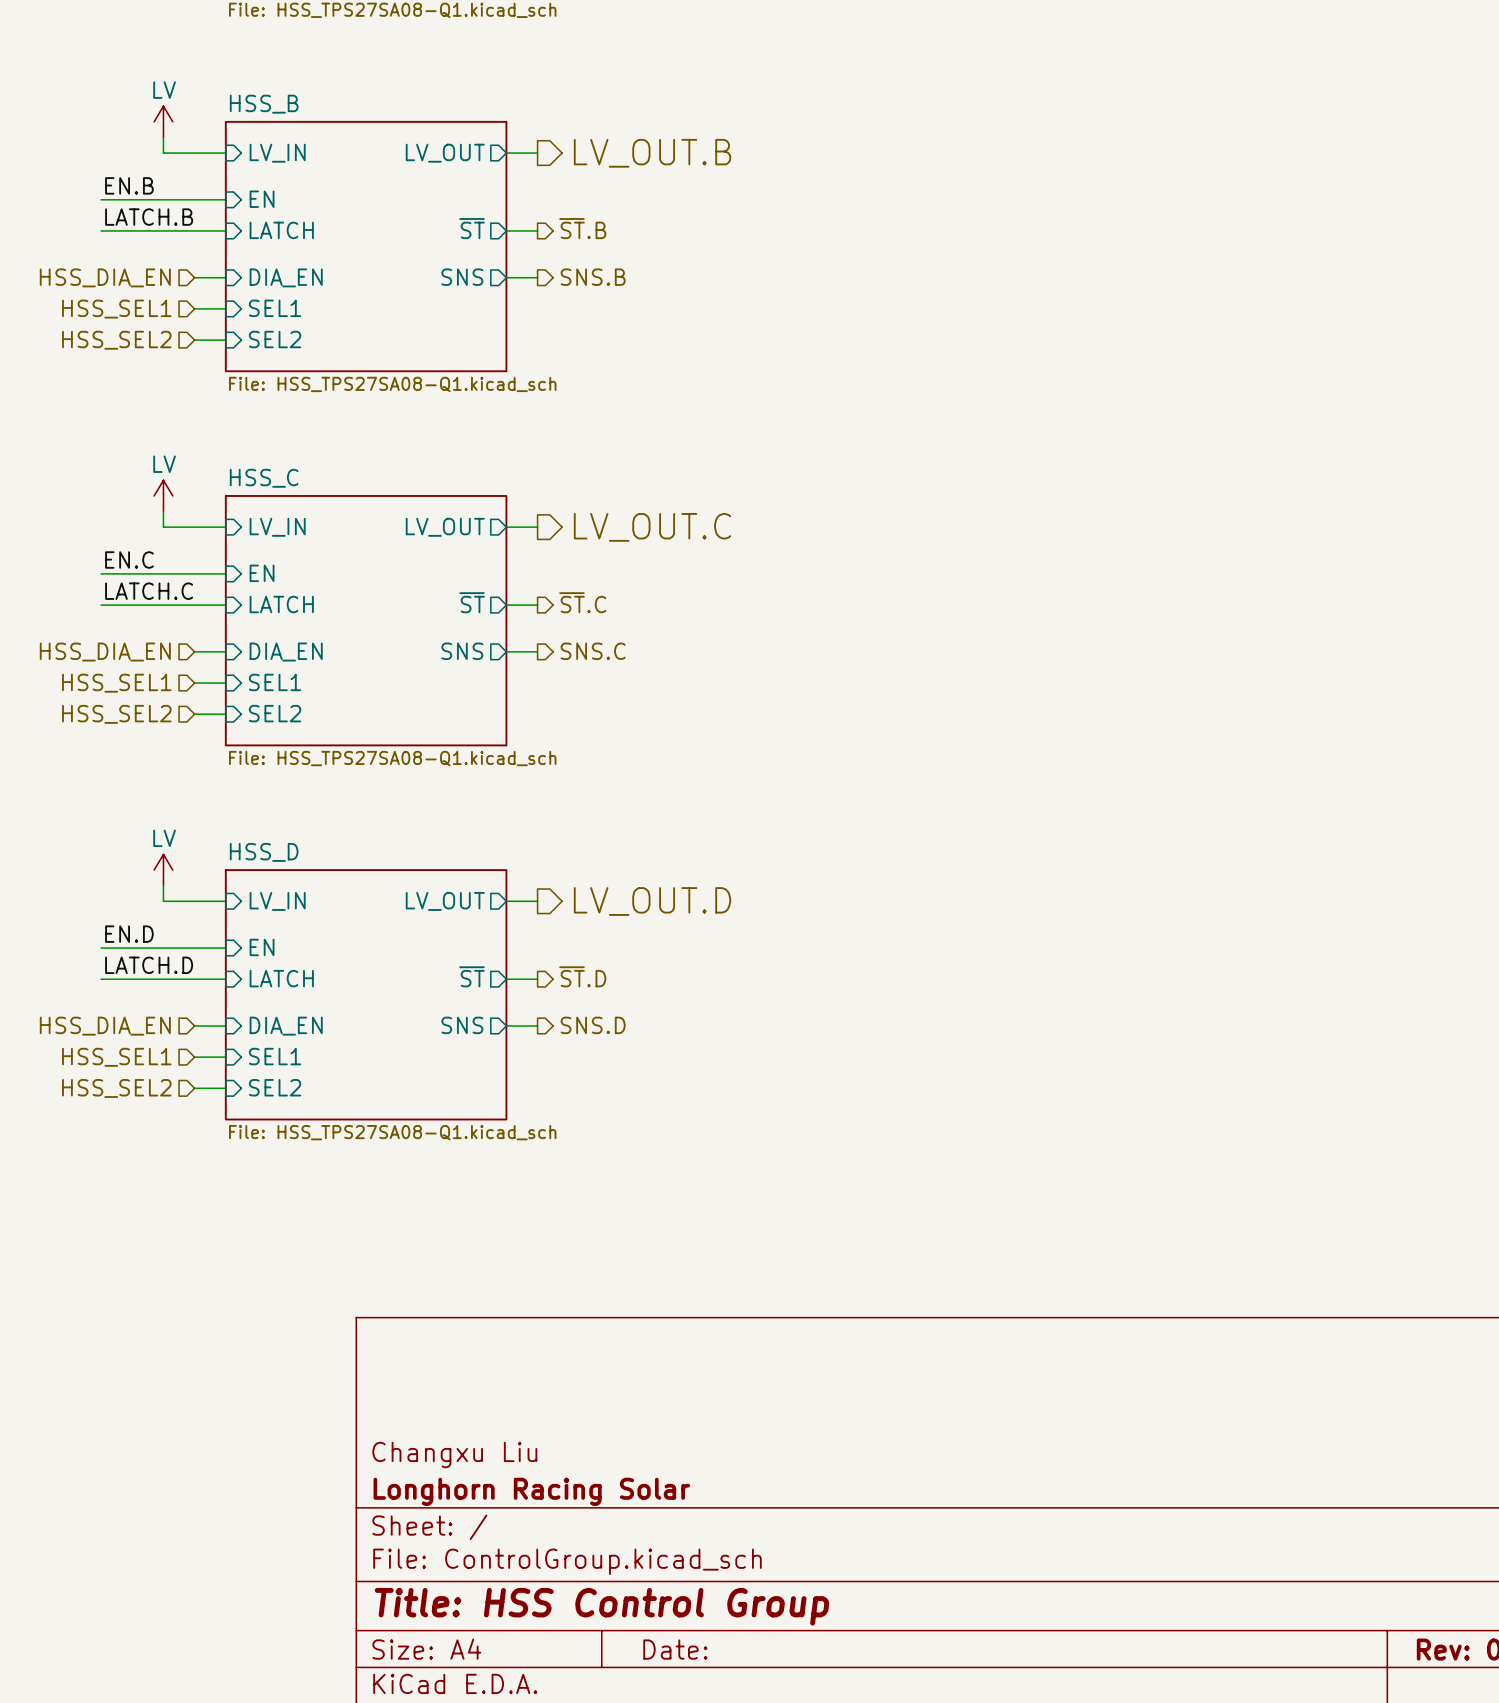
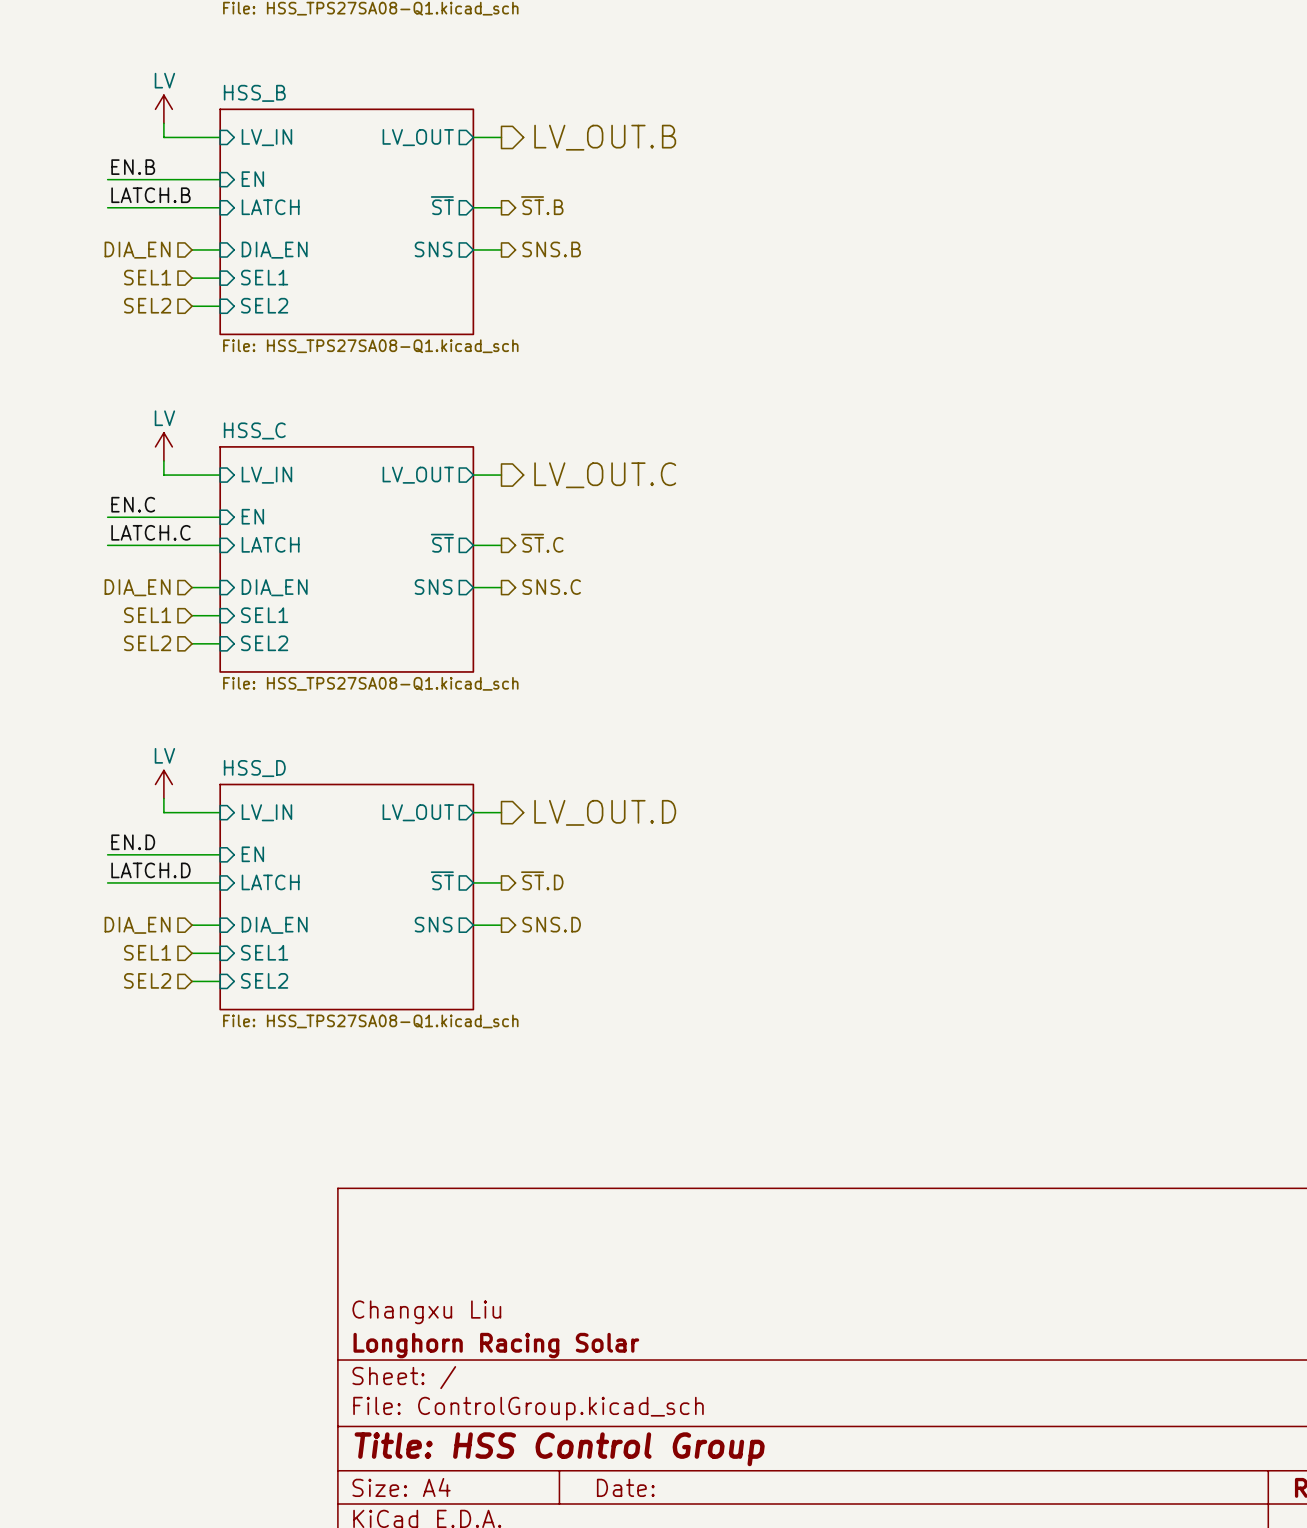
hierarchical label: HSS_DIA_EN (105, 277) -> DIA_EN (137, 250)
hierarchical label: HSS_SEL1 (116, 309) -> SEL1 (147, 277)
hierarchical label: HSS_SEL2 (116, 340) -> SEL2 (147, 305)
hierarchical label: HSS_DIA_EN (105, 652) -> DIA_EN (137, 587)
hierarchical label: HSS_SEL1 (116, 683) -> SEL1 (147, 615)
hierarchical label: HSS_SEL2 (116, 714) -> SEL2 (147, 643)
hierarchical label: HSS_DIA_EN (105, 1026) -> DIA_EN (137, 925)
hierarchical label: HSS_SEL1 (116, 1057) -> SEL1 (147, 952)
hierarchical label: HSS_SEL2 (116, 1088) -> SEL2 (147, 980)

